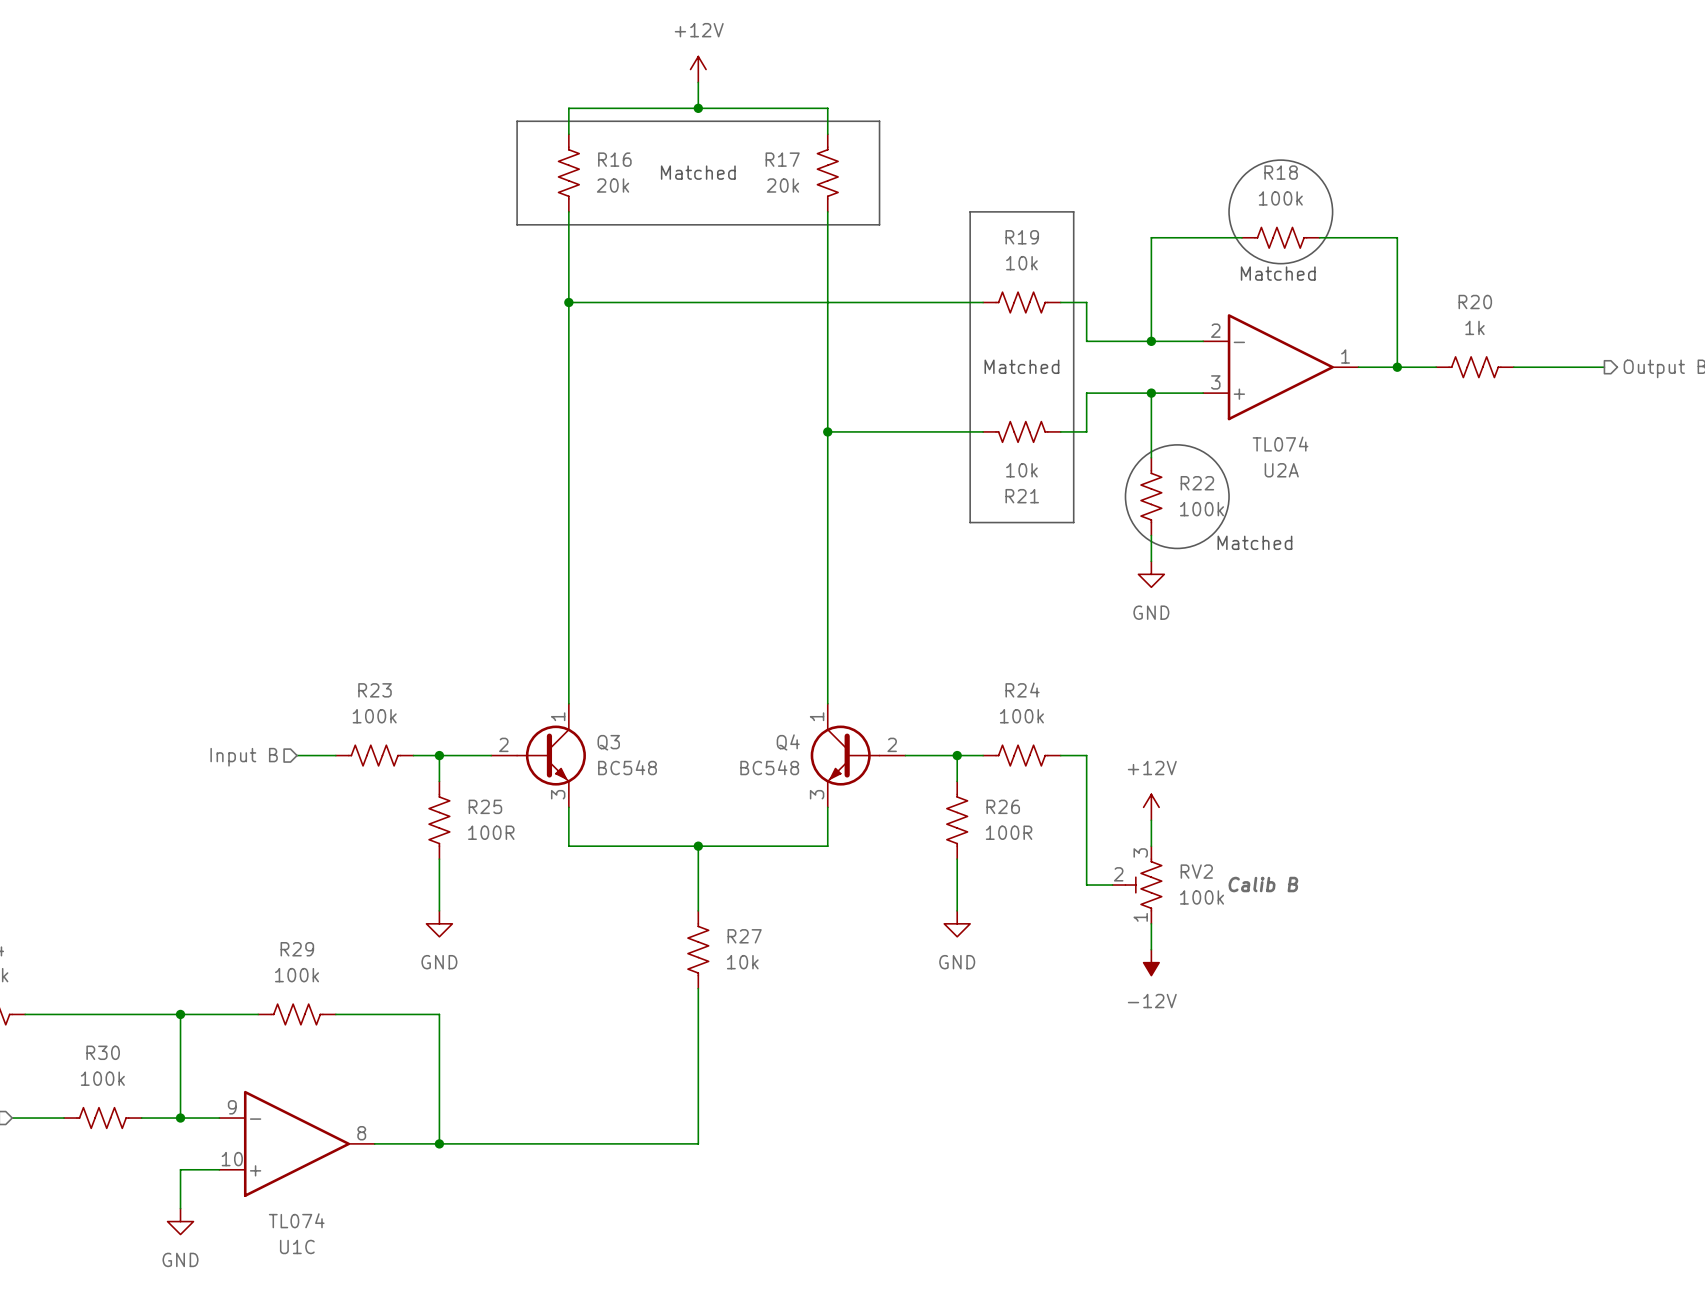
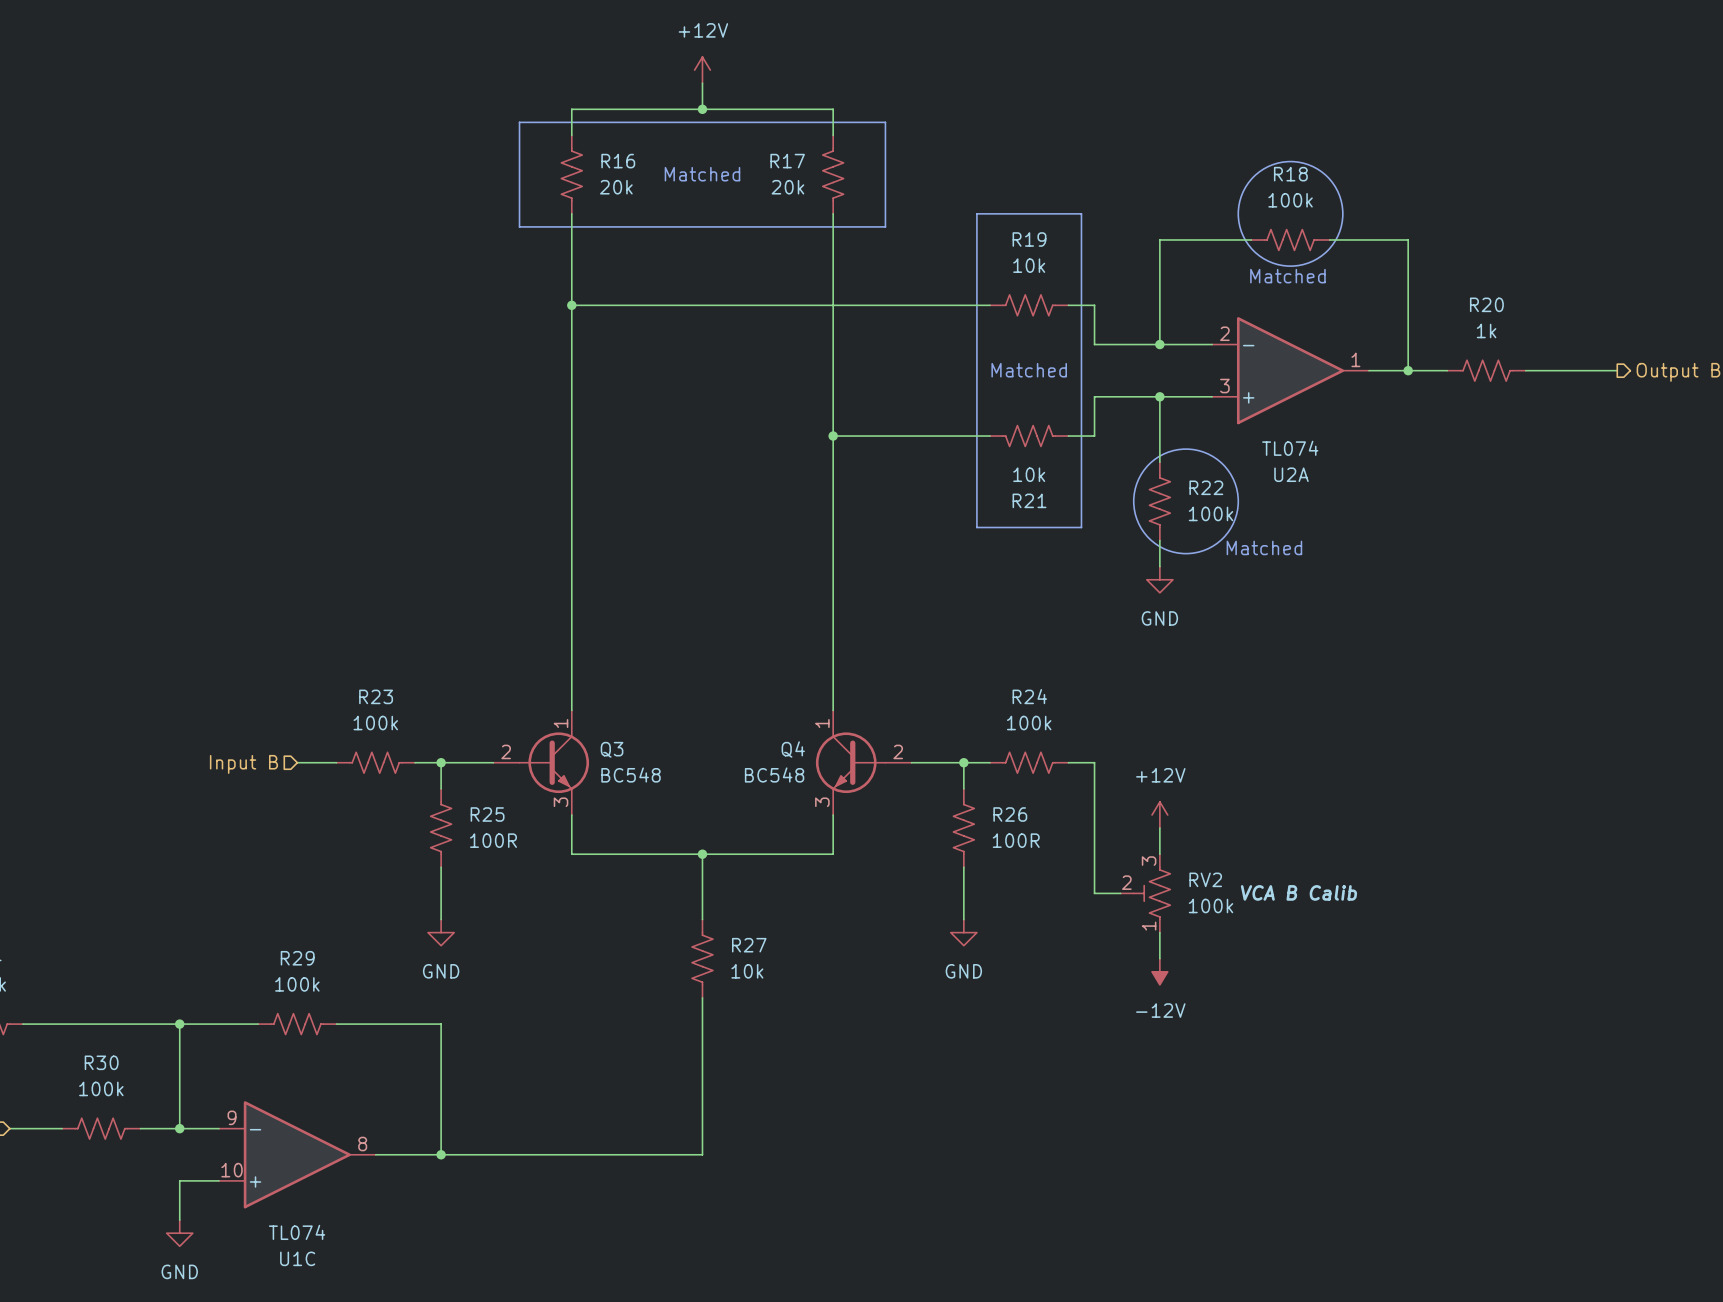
RV2 text: Calib B (1263, 884) -> VCA B Calib (1298, 892)

